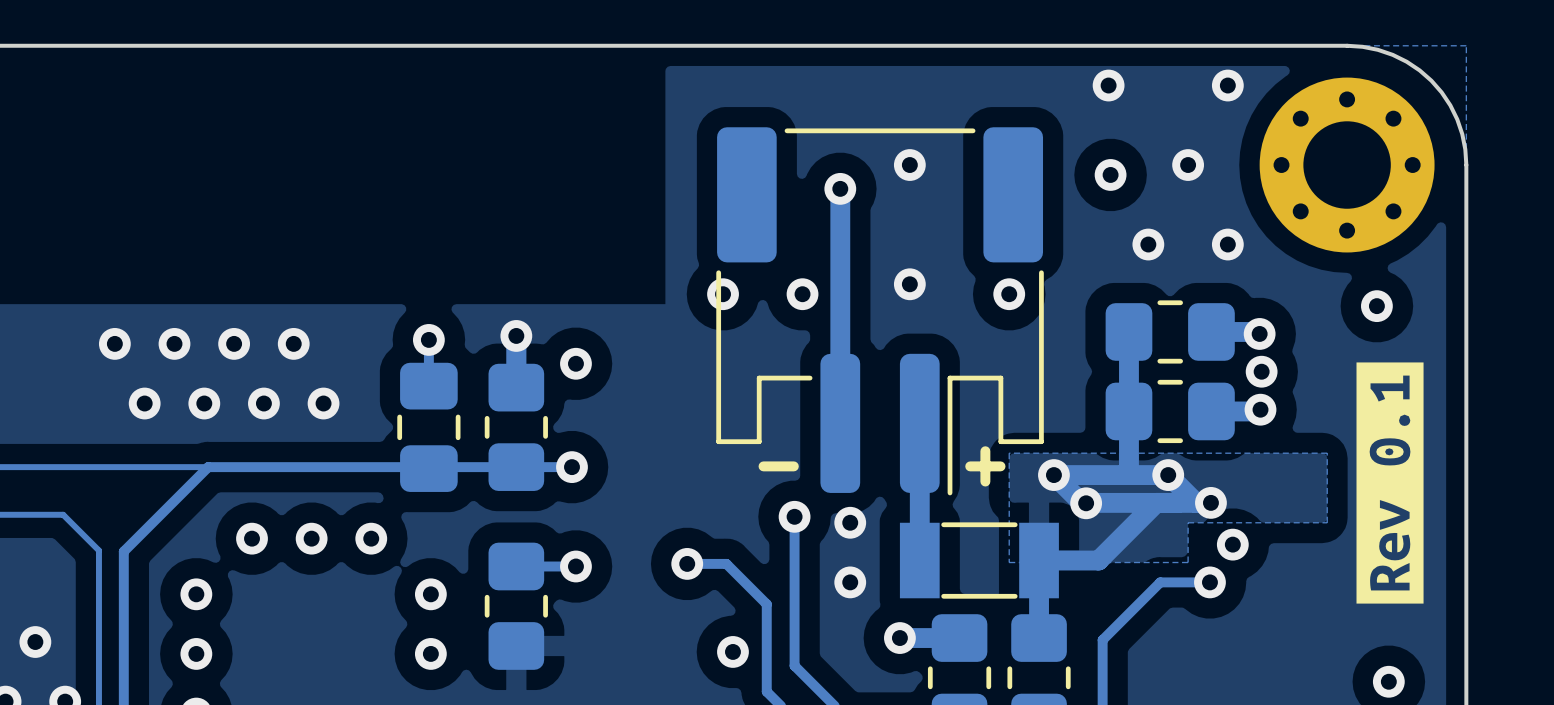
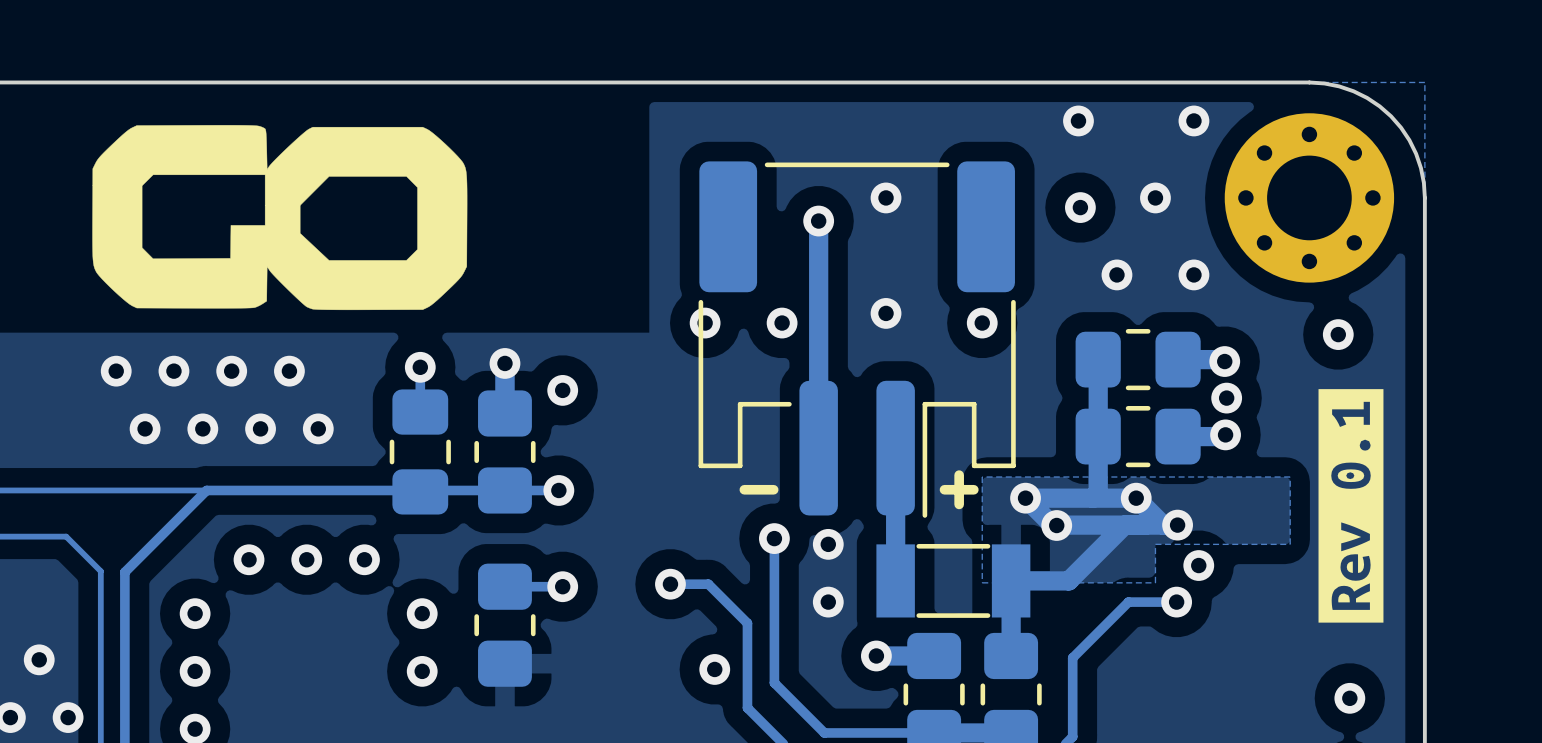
drawing: none -> [92, 125, 468, 311]

